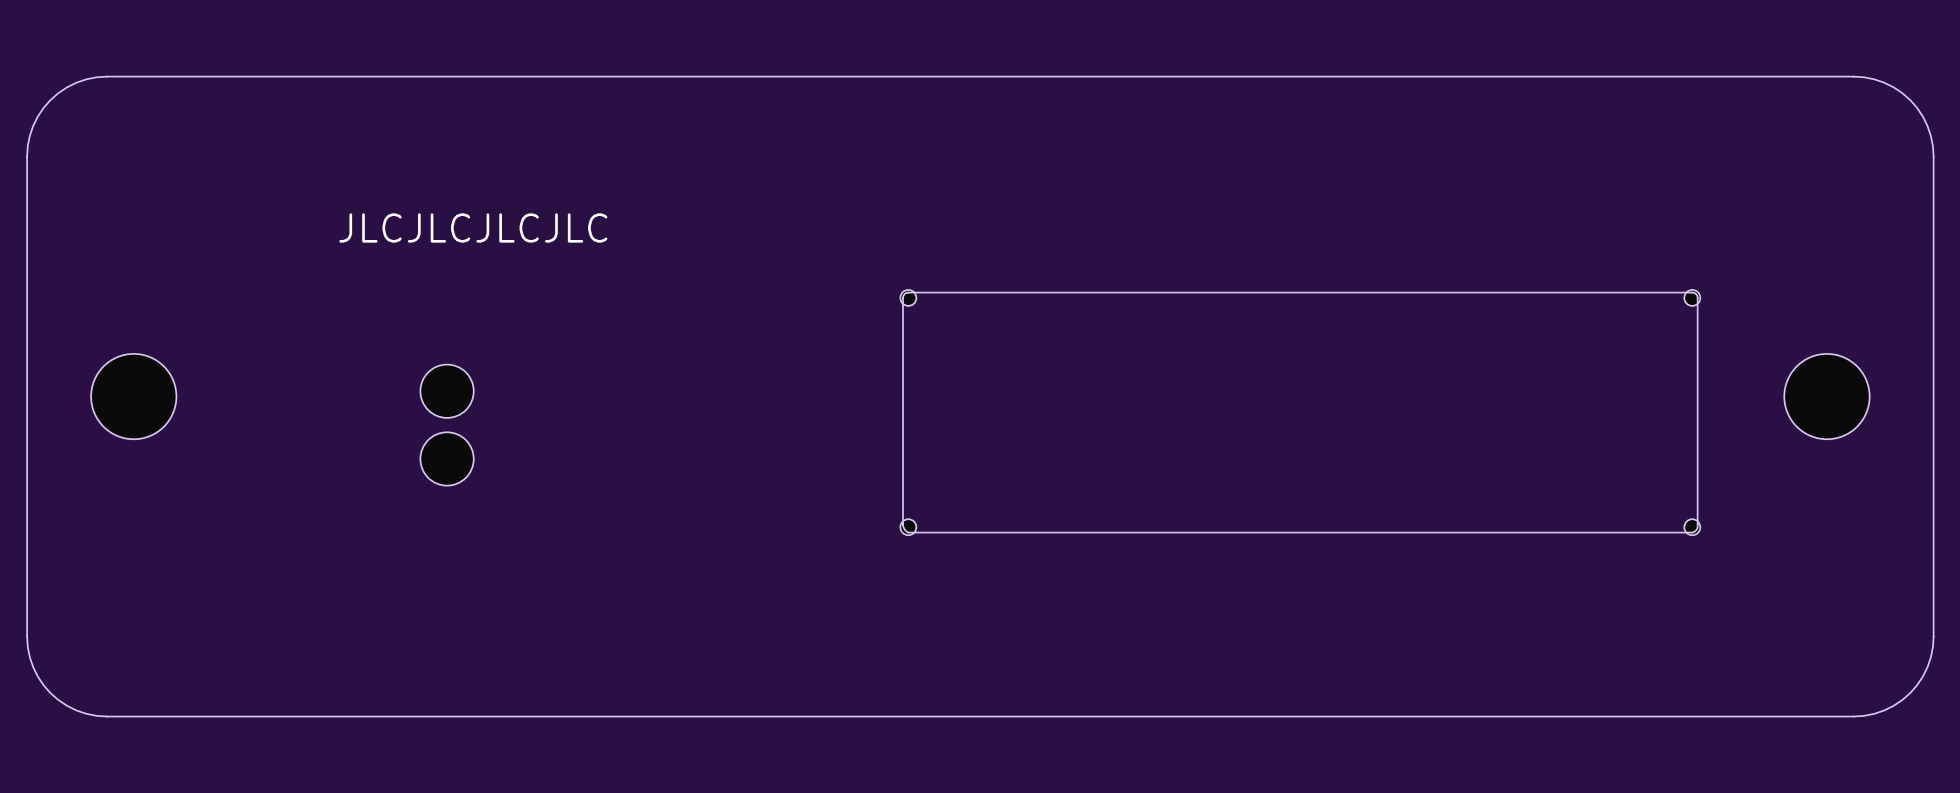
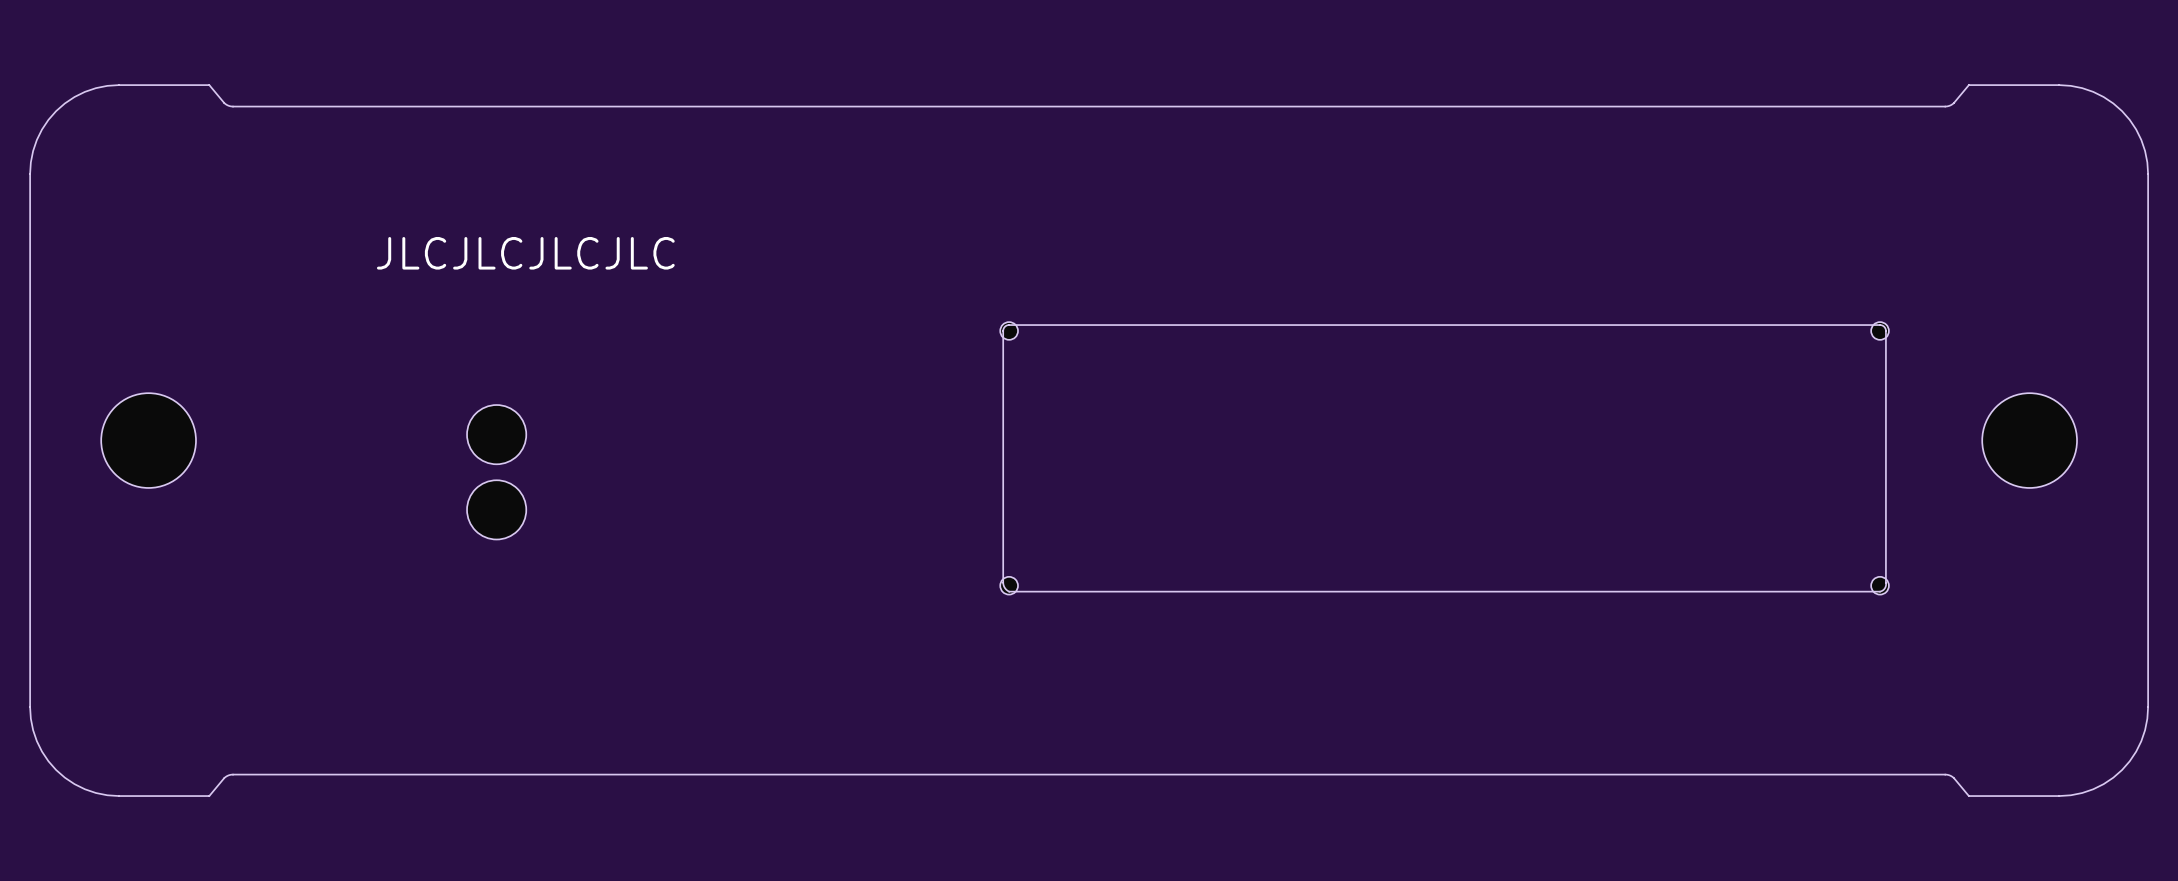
part footprint: [26, 75, 1935, 718] -> [29, 84, 2149, 797]

